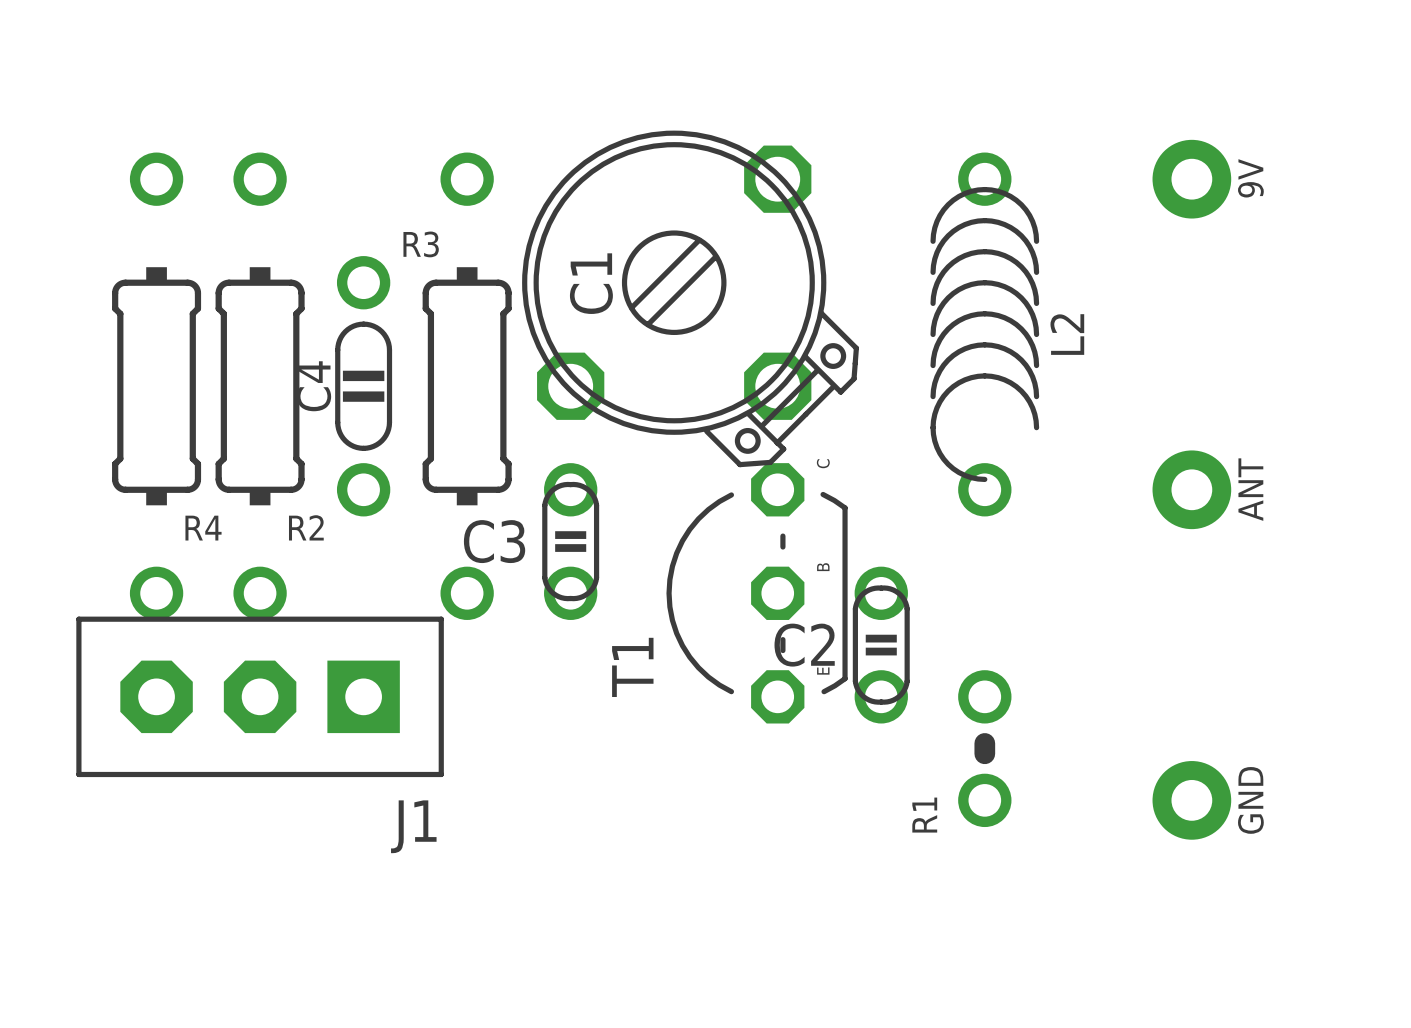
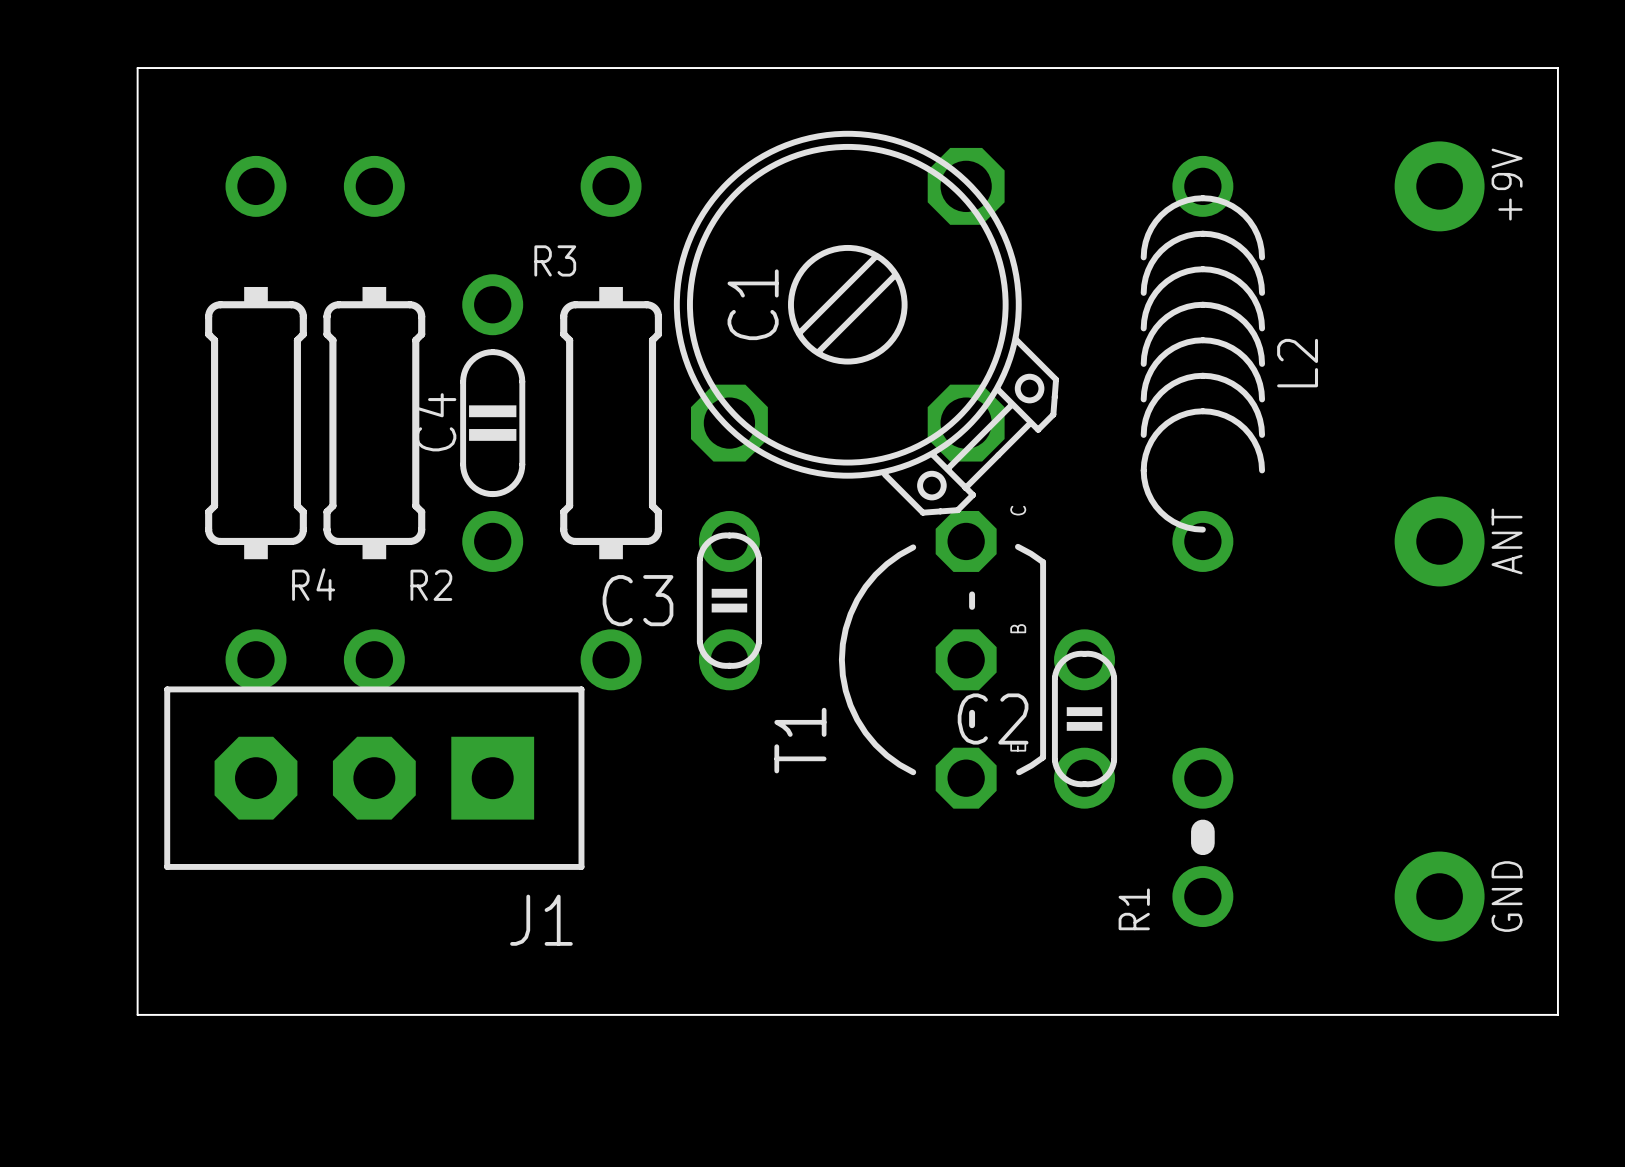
board edge: none -> (137, 68) (137, 1014) (1557, 1014) (1557, 68) (137, 68)
9V name: 9V (1250, 178) -> +9V (1507, 184)

